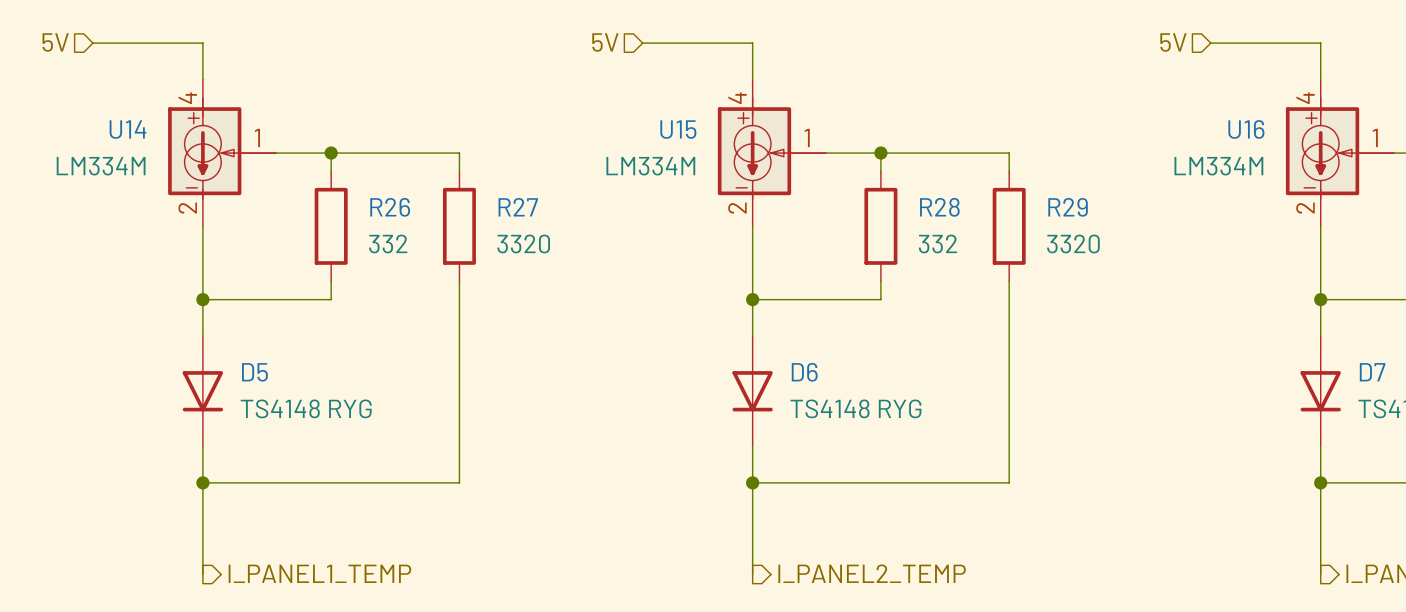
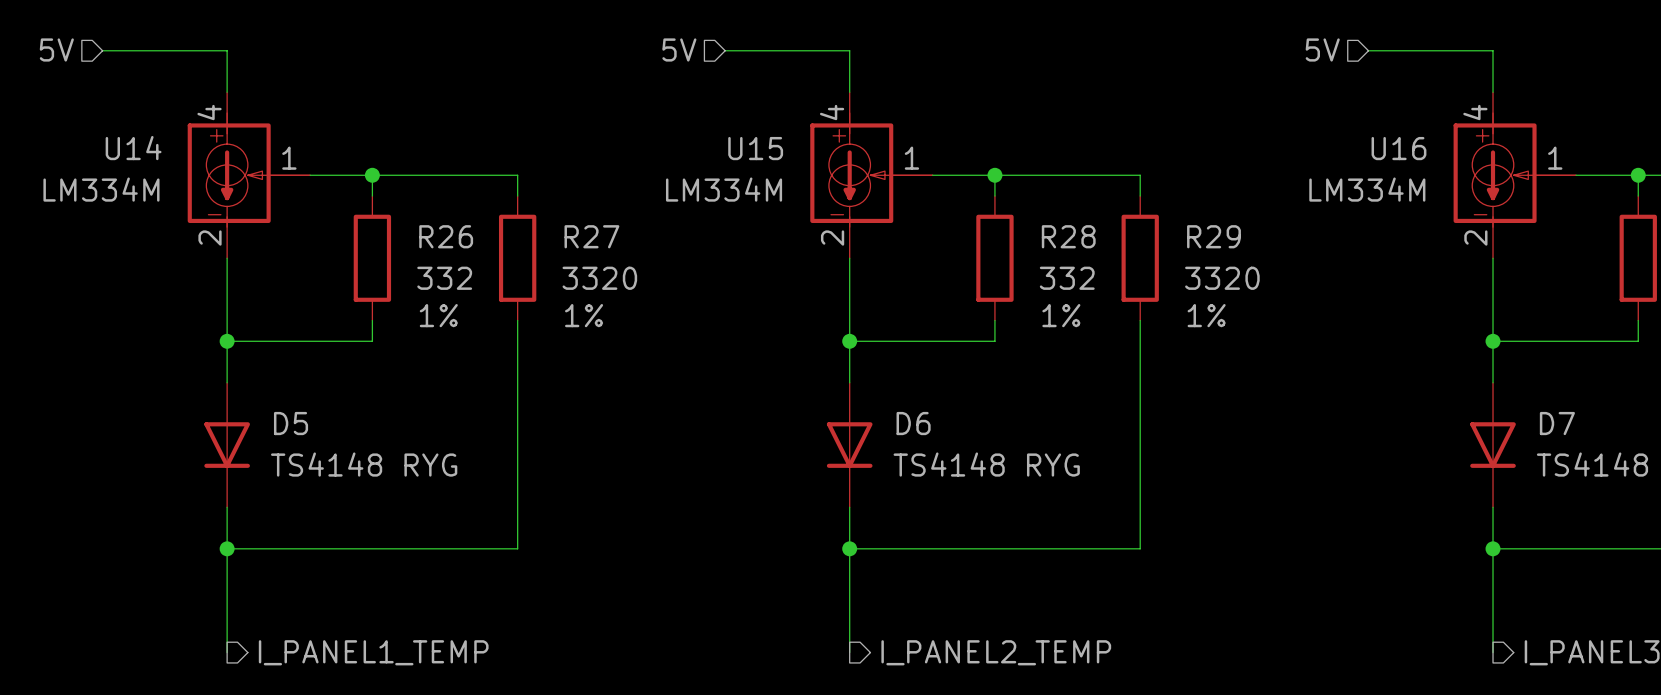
R26 text: none -> 1% (438, 315)
R27 text: none -> 1% (584, 315)
R28 text: none -> 1% (1061, 315)
R29 text: none -> 1% (1206, 315)

